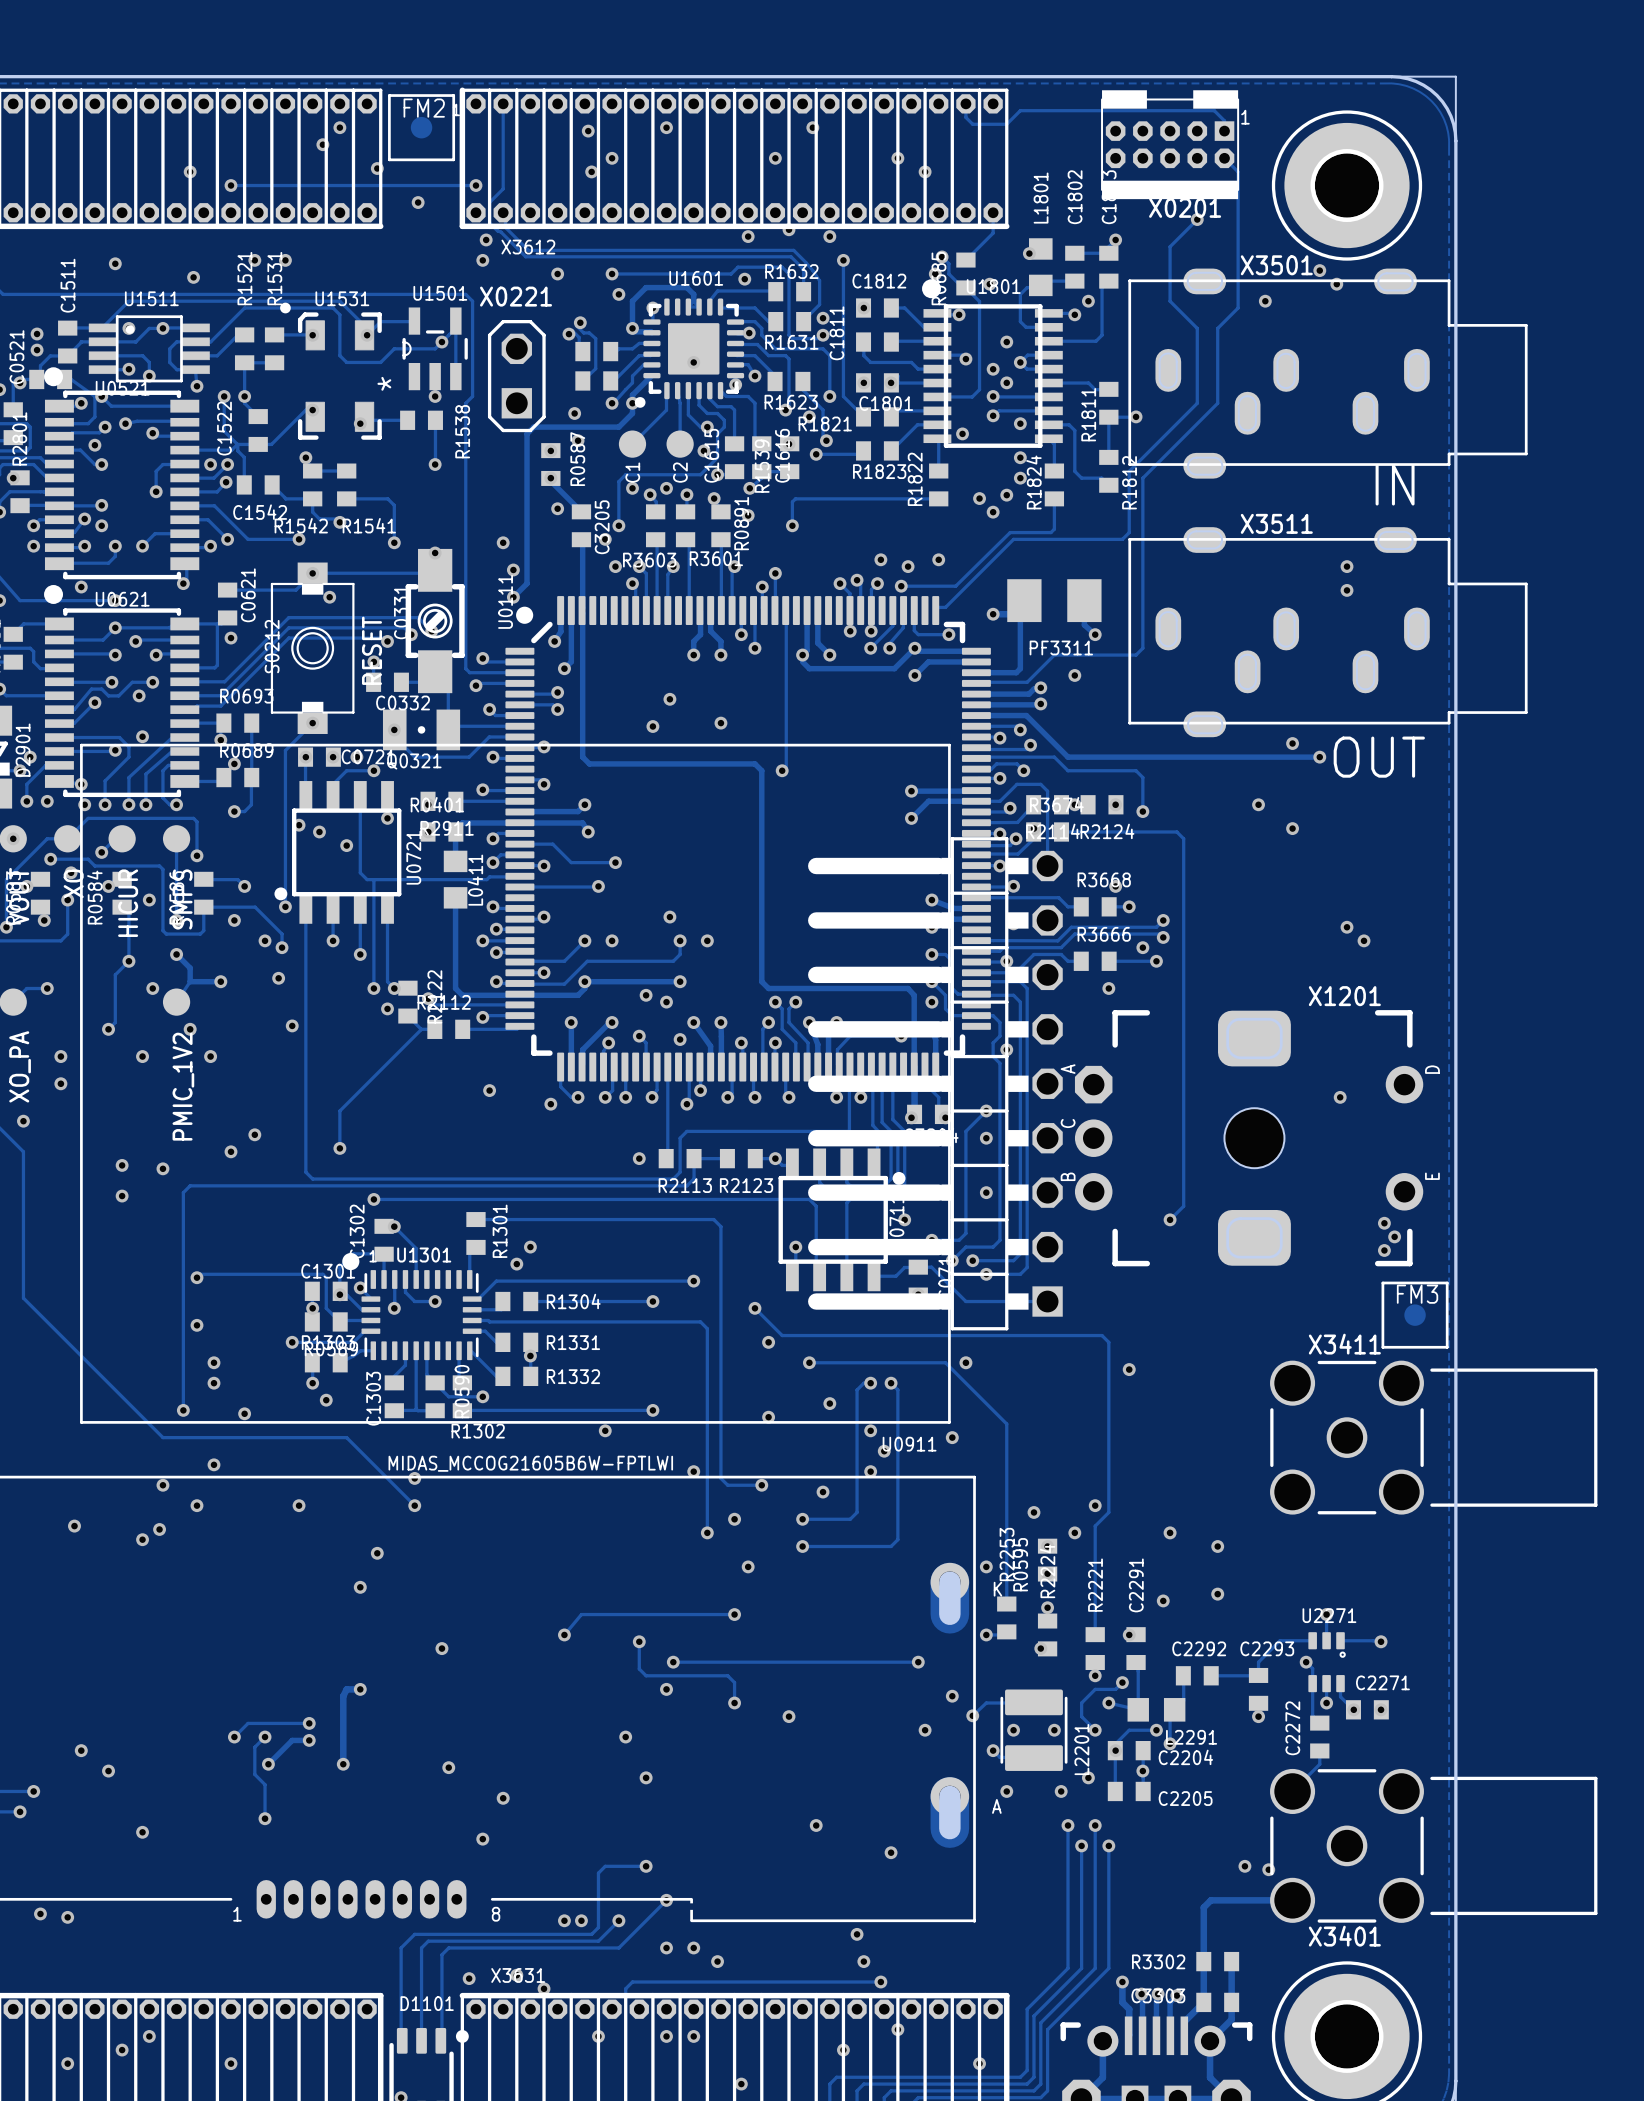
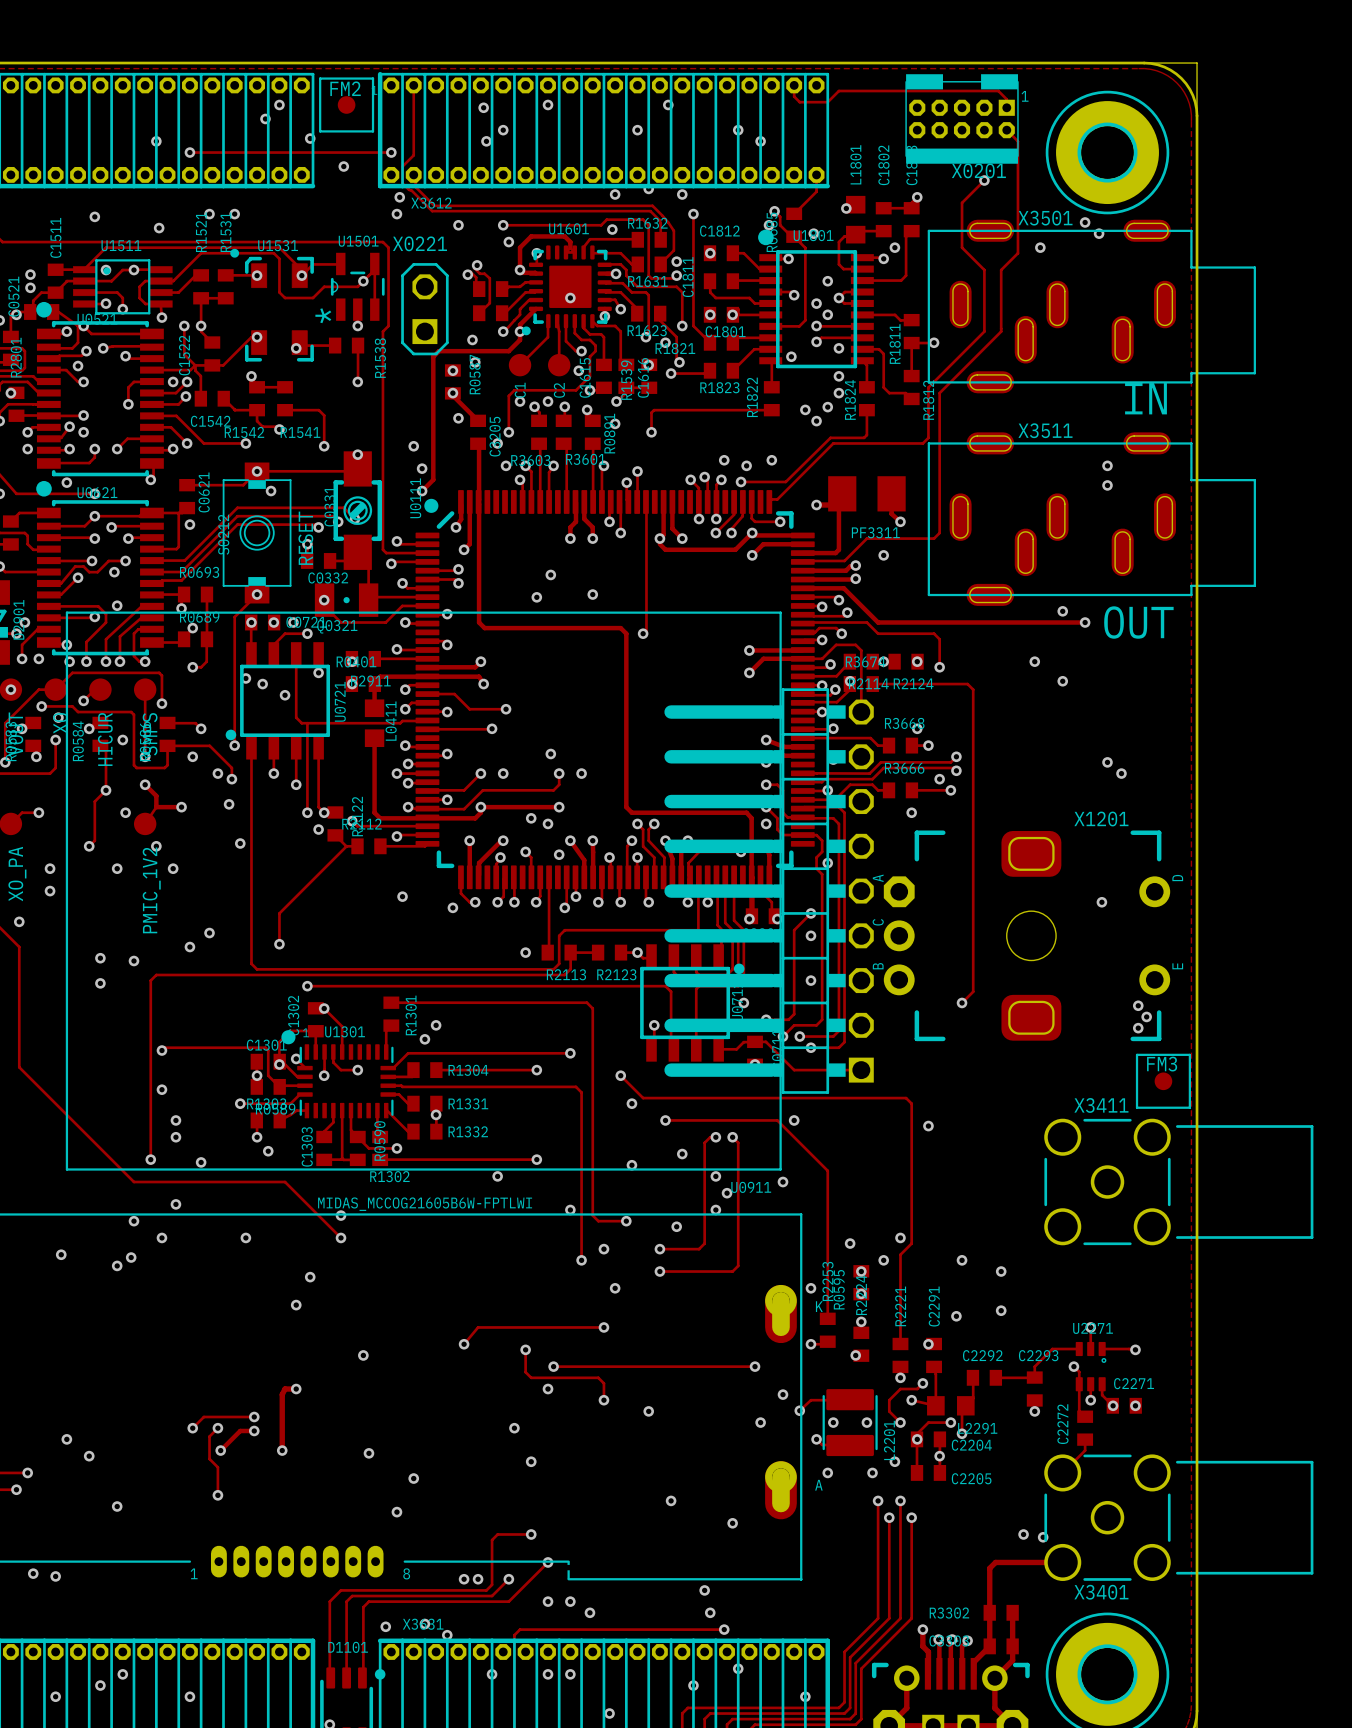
X3501 footprint: [1128, 268, 1528, 479] -> [927, 219, 1256, 394]
X3511 footprint: [1128, 527, 1528, 738] -> [927, 432, 1256, 606]

